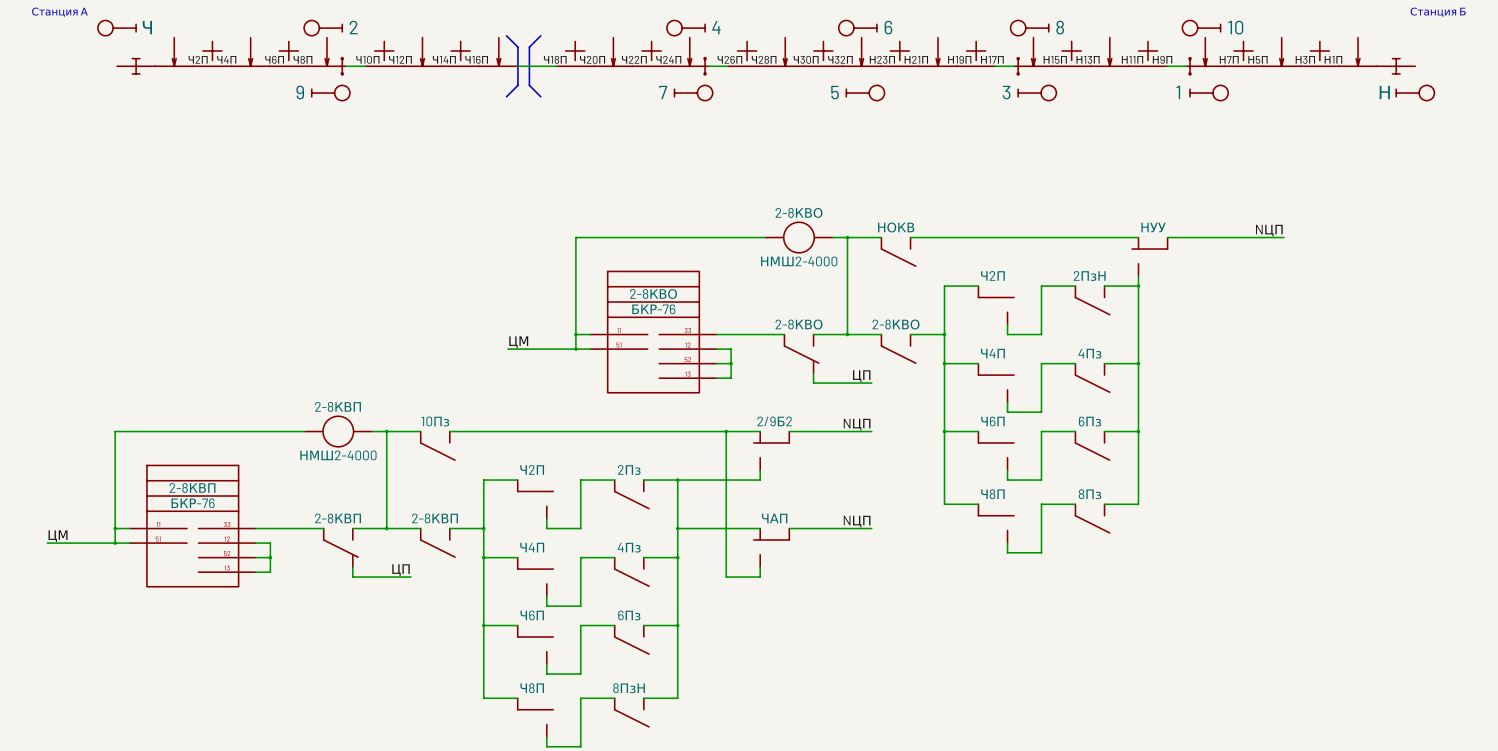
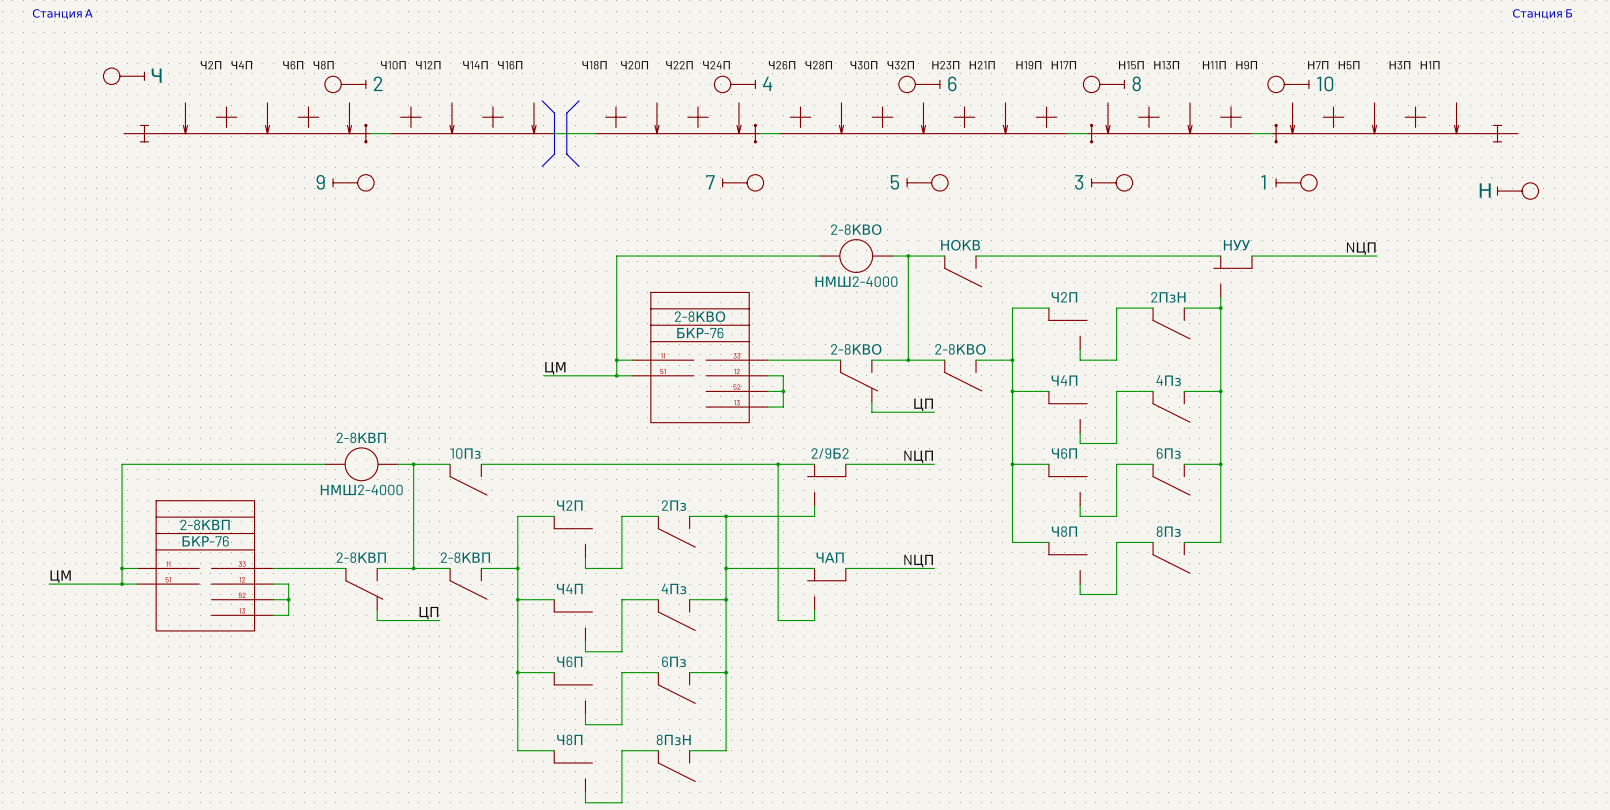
part position: (116, 28) -> (123, 76)
part position: (323, 28) -> (345, 84)
part position: (685, 28) -> (734, 84)
part position: (857, 28) -> (919, 84)
part position: (1029, 28) -> (1103, 84)
part position: (1201, 28) -> (1288, 84)
line: (506, 35) (517, 47) (517, 85) (506, 96) -> (542, 100) (554, 113) (554, 154) (542, 166)
line: (540, 35) (529, 47) (529, 85) (540, 96) -> (579, 100) (566, 113) (566, 154) (579, 166)
part: (174, 51) -> none
part: (250, 51) -> none
part: (327, 51) -> none
part: (422, 51) -> none
part: (498, 51) -> none
part: (613, 51) -> none
part: (689, 51) -> none
part: (785, 51) -> none
part: (861, 51) -> none
part: (938, 51) -> none
part: (1033, 51) -> none
part: (1109, 51) -> none
part: (1205, 51) -> none
part: (1281, 51) -> none
part: (1358, 51) -> none
part: (212, 53) -> none
part: (288, 53) -> none
part: (384, 53) -> none
part: (460, 53) -> none
part: (575, 53) -> none
part: (651, 53) -> none
part: (747, 53) -> none
part: (823, 53) -> none
part: (899, 53) -> none
part: (976, 53) -> none
part: (1071, 53) -> none
part: (1148, 53) -> none
part: (1243, 53) -> none
part: (1319, 53) -> none
part position: (136, 66) -> (144, 133)
part position: (342, 66) -> (365, 133)
wire: (346, 66) (365, 66) -> (369, 133) (390, 133)
wire: (517, 66) (556, 66) -> (554, 133) (595, 133)
part position: (705, 66) -> (755, 133)
wire: (708, 66) (727, 66) -> (759, 133) (779, 133)
wire: (995, 66) (1014, 66) -> (1066, 133) (1087, 133)
part position: (1018, 66) -> (1091, 133)
wire: (1167, 66) (1186, 66) -> (1251, 133) (1272, 133)
part position: (1190, 66) -> (1276, 133)
part position: (1396, 66) -> (1497, 133)
part position: (330, 93) -> (353, 182)
part position: (693, 93) -> (743, 182)
part position: (865, 93) -> (927, 182)
part position: (1037, 93) -> (1112, 182)
part position: (1209, 93) -> (1296, 182)
part position: (1415, 93) -> (1518, 191)
part: none -> (185, 118)
part: none -> (267, 118)
part: none -> (349, 118)
part: none -> (451, 118)
part: none -> (533, 118)
part: none -> (656, 118)
part: none -> (738, 118)
part: none -> (841, 118)
part: none -> (923, 118)
part: none -> (1005, 118)
part: none -> (1108, 118)
part: none -> (1190, 118)
part: none -> (1292, 118)
part: none -> (1374, 118)
part: none -> (1456, 118)
part: none -> (226, 120)
part: none -> (308, 120)
part: none -> (410, 120)
part: none -> (492, 120)
part: none -> (615, 120)
part: none -> (697, 120)
part: none -> (800, 120)
part: none -> (882, 120)
part: none -> (964, 120)
part: none -> (1046, 120)
part: none -> (1149, 120)
part: none -> (1231, 120)
part: none -> (1333, 120)
part: none -> (1415, 120)

